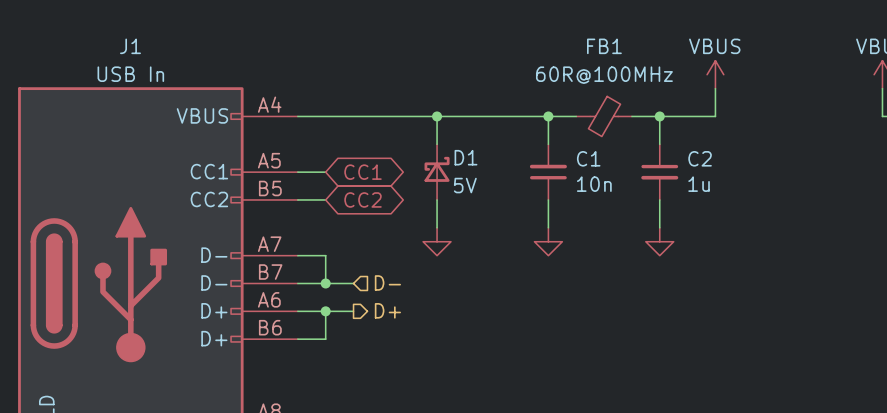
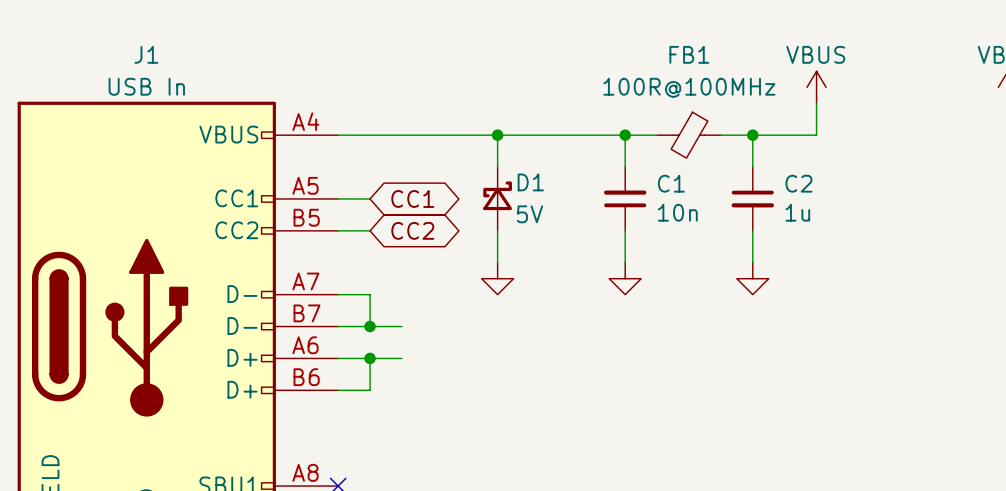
FB1 value: 60R@100MHz (604, 75) -> 100R@100MHz (689, 87)
hierarchical label: D- (387, 282) -> none
hierarchical label: D+ (387, 310) -> none

